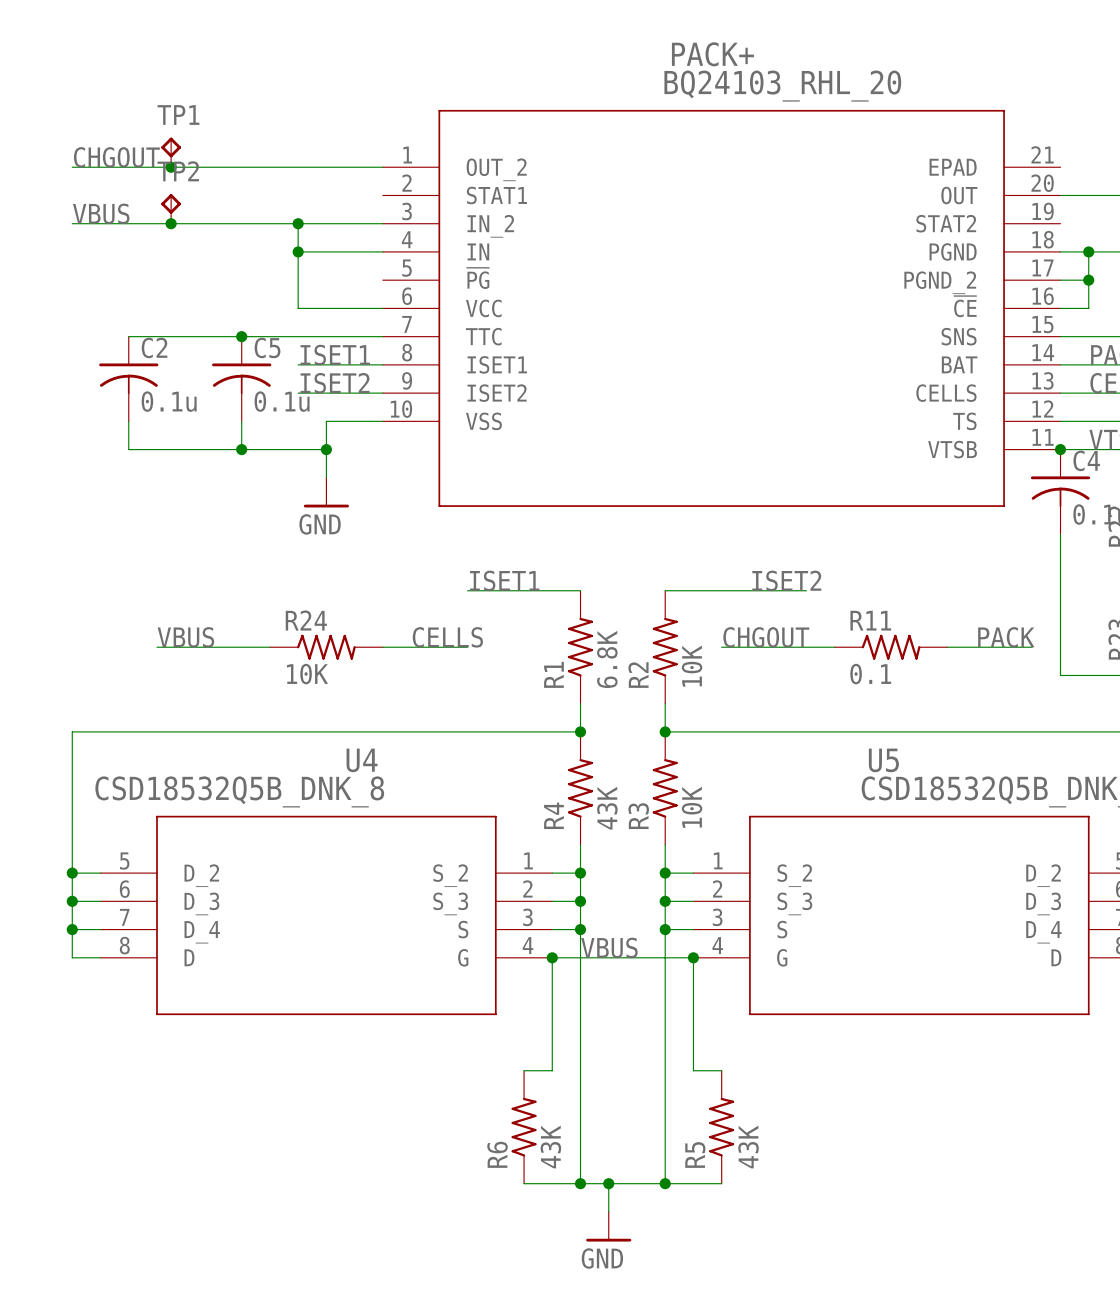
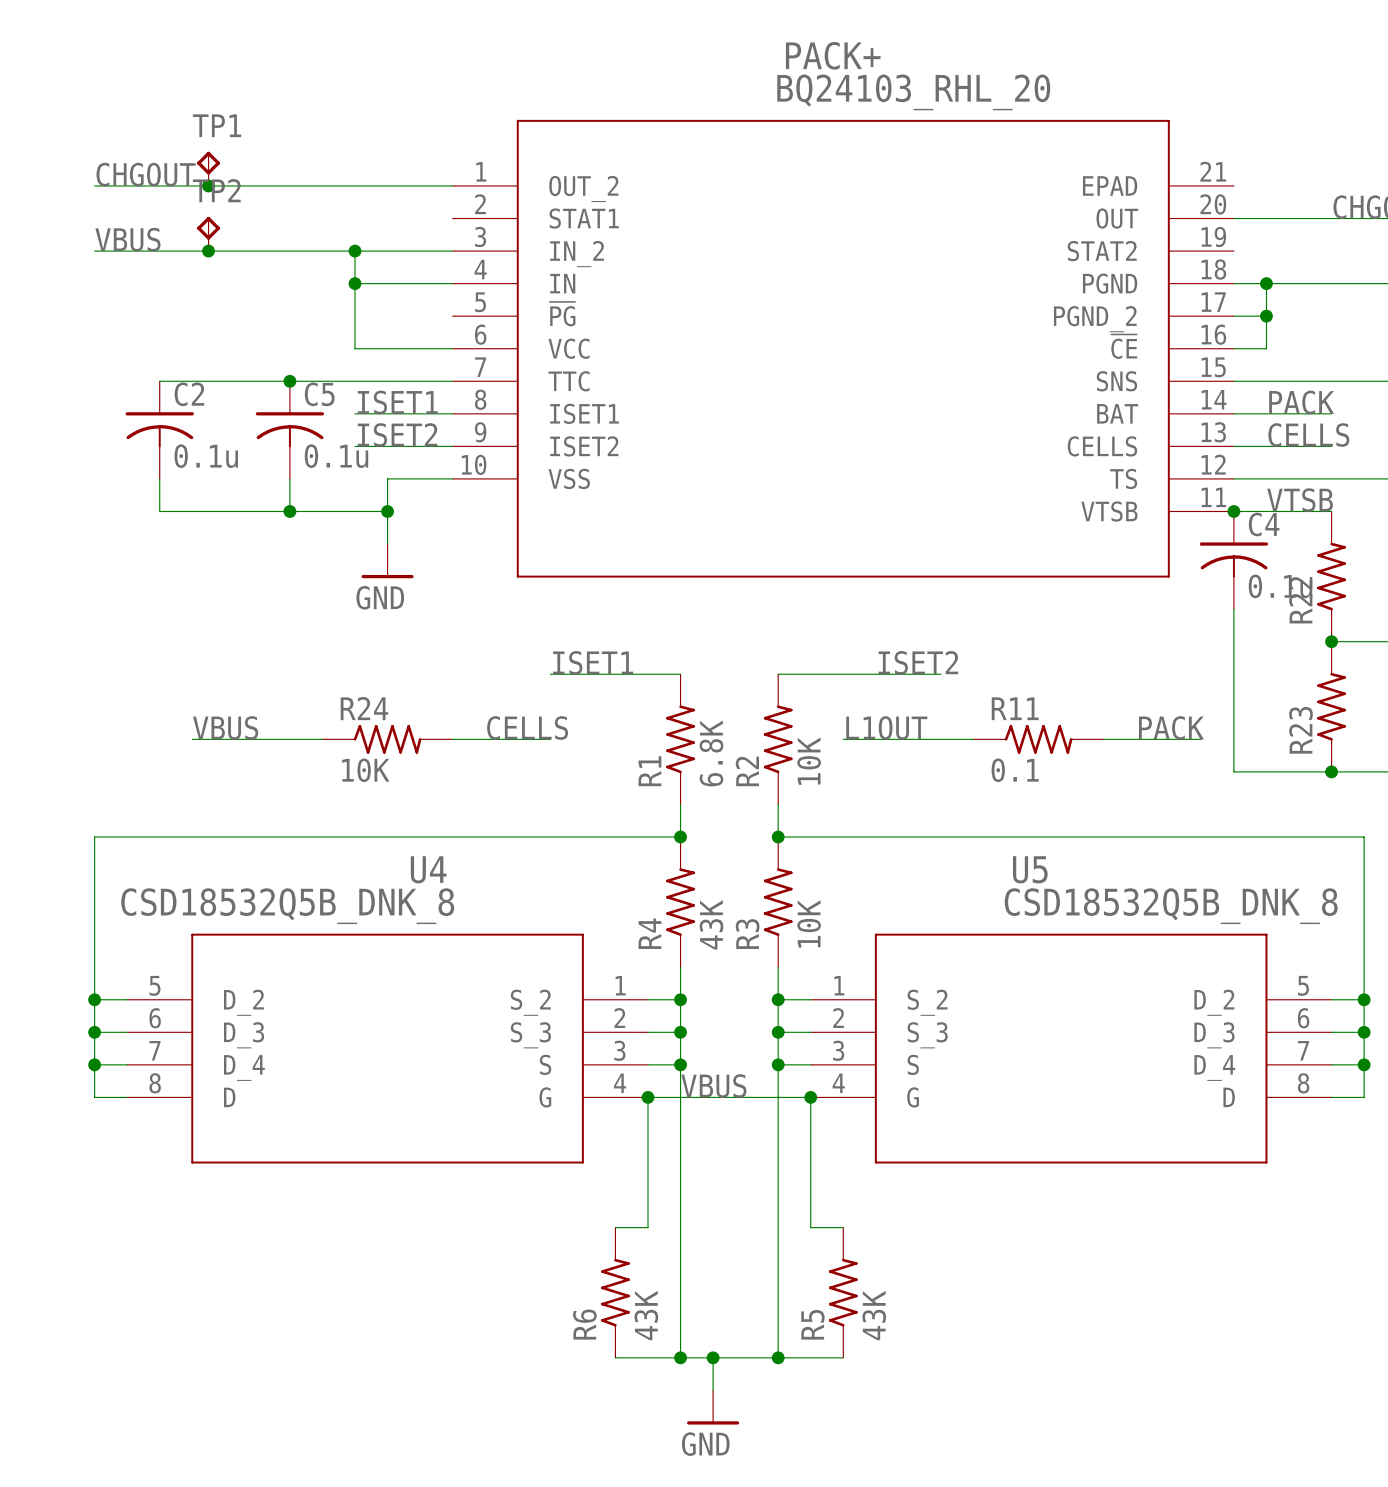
label: CHGOUT (766, 637) -> L1OUT (886, 727)

